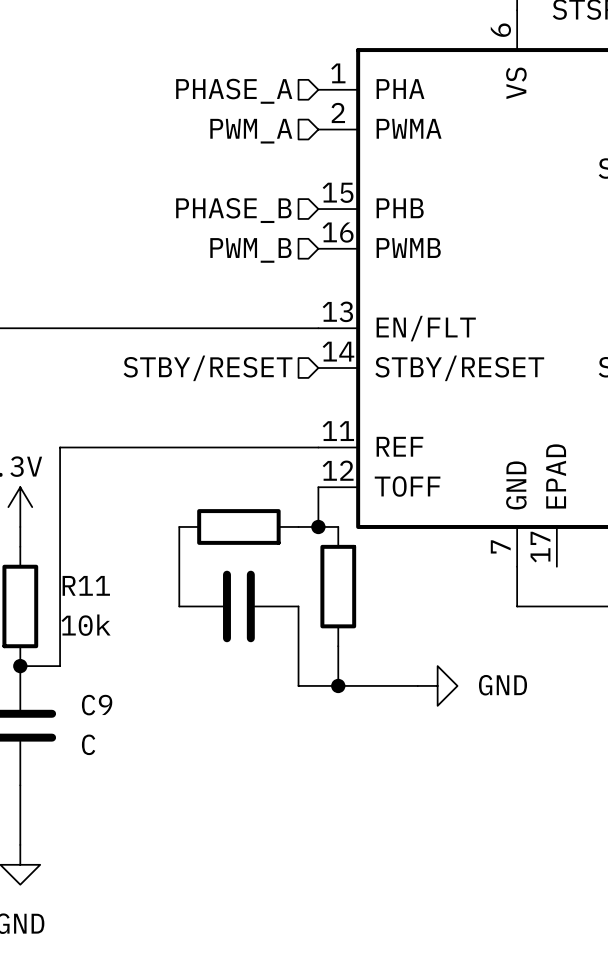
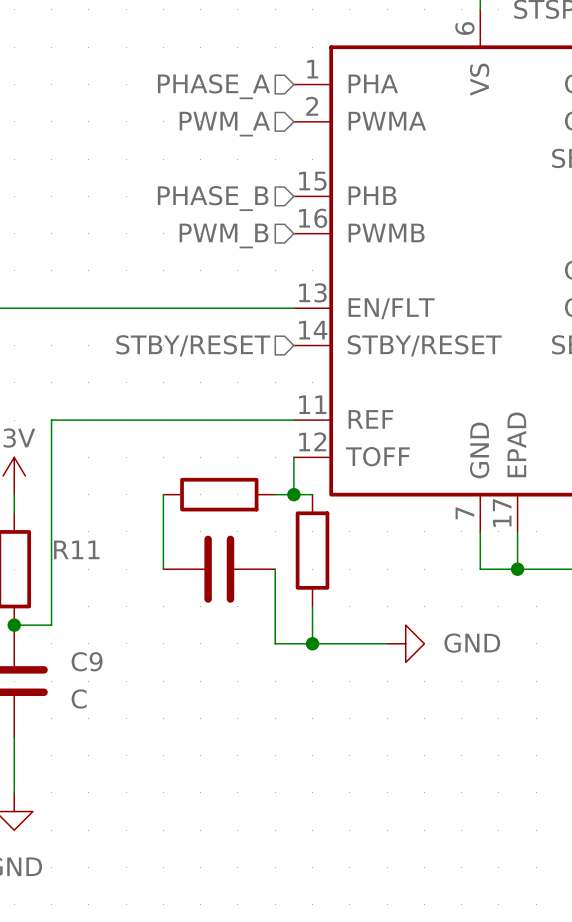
wire: none -> (517, 531) (517, 569)
junction: none -> (517, 569)
R11 value: 10k (86, 625) -> none

